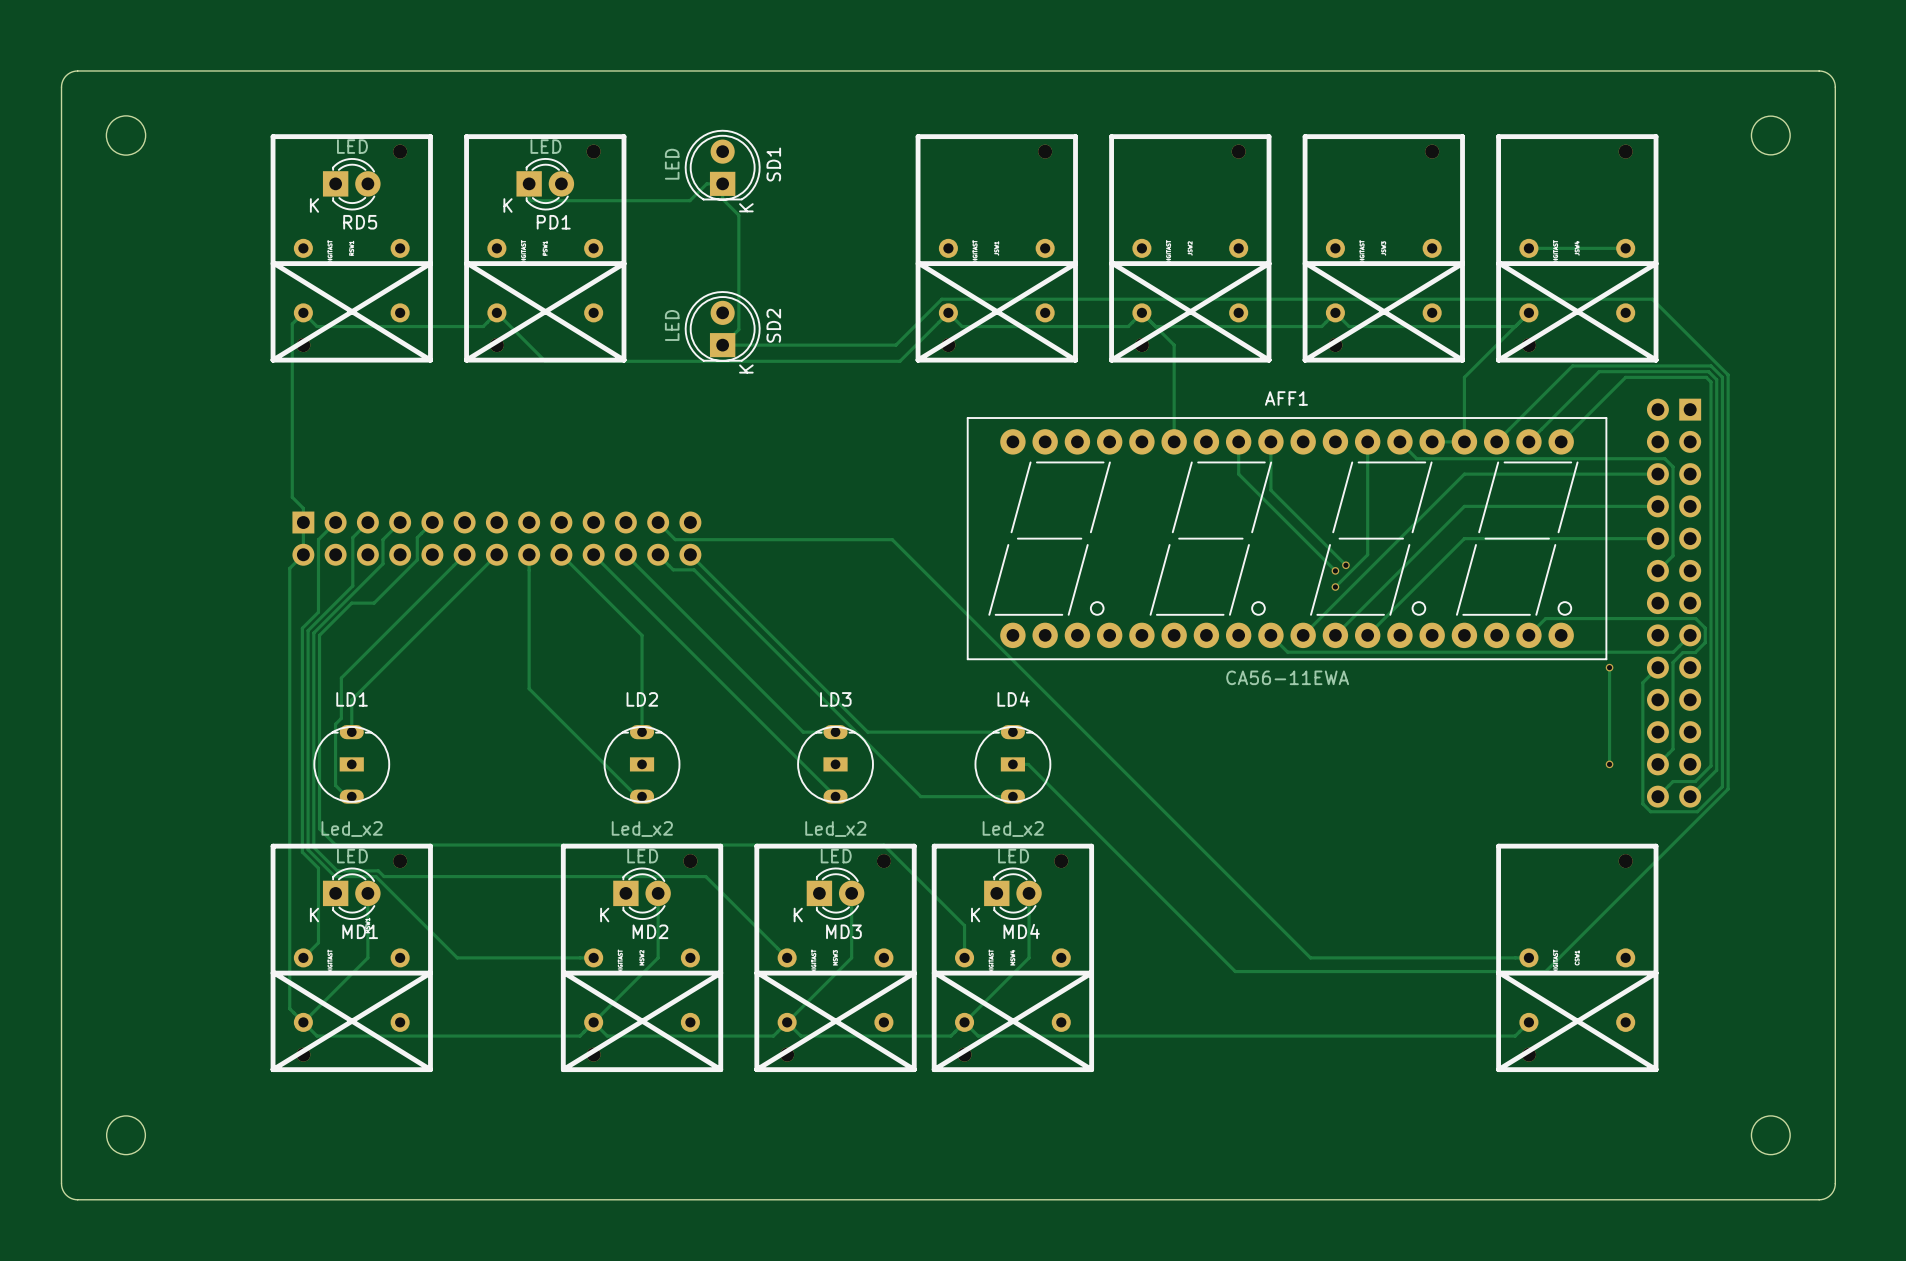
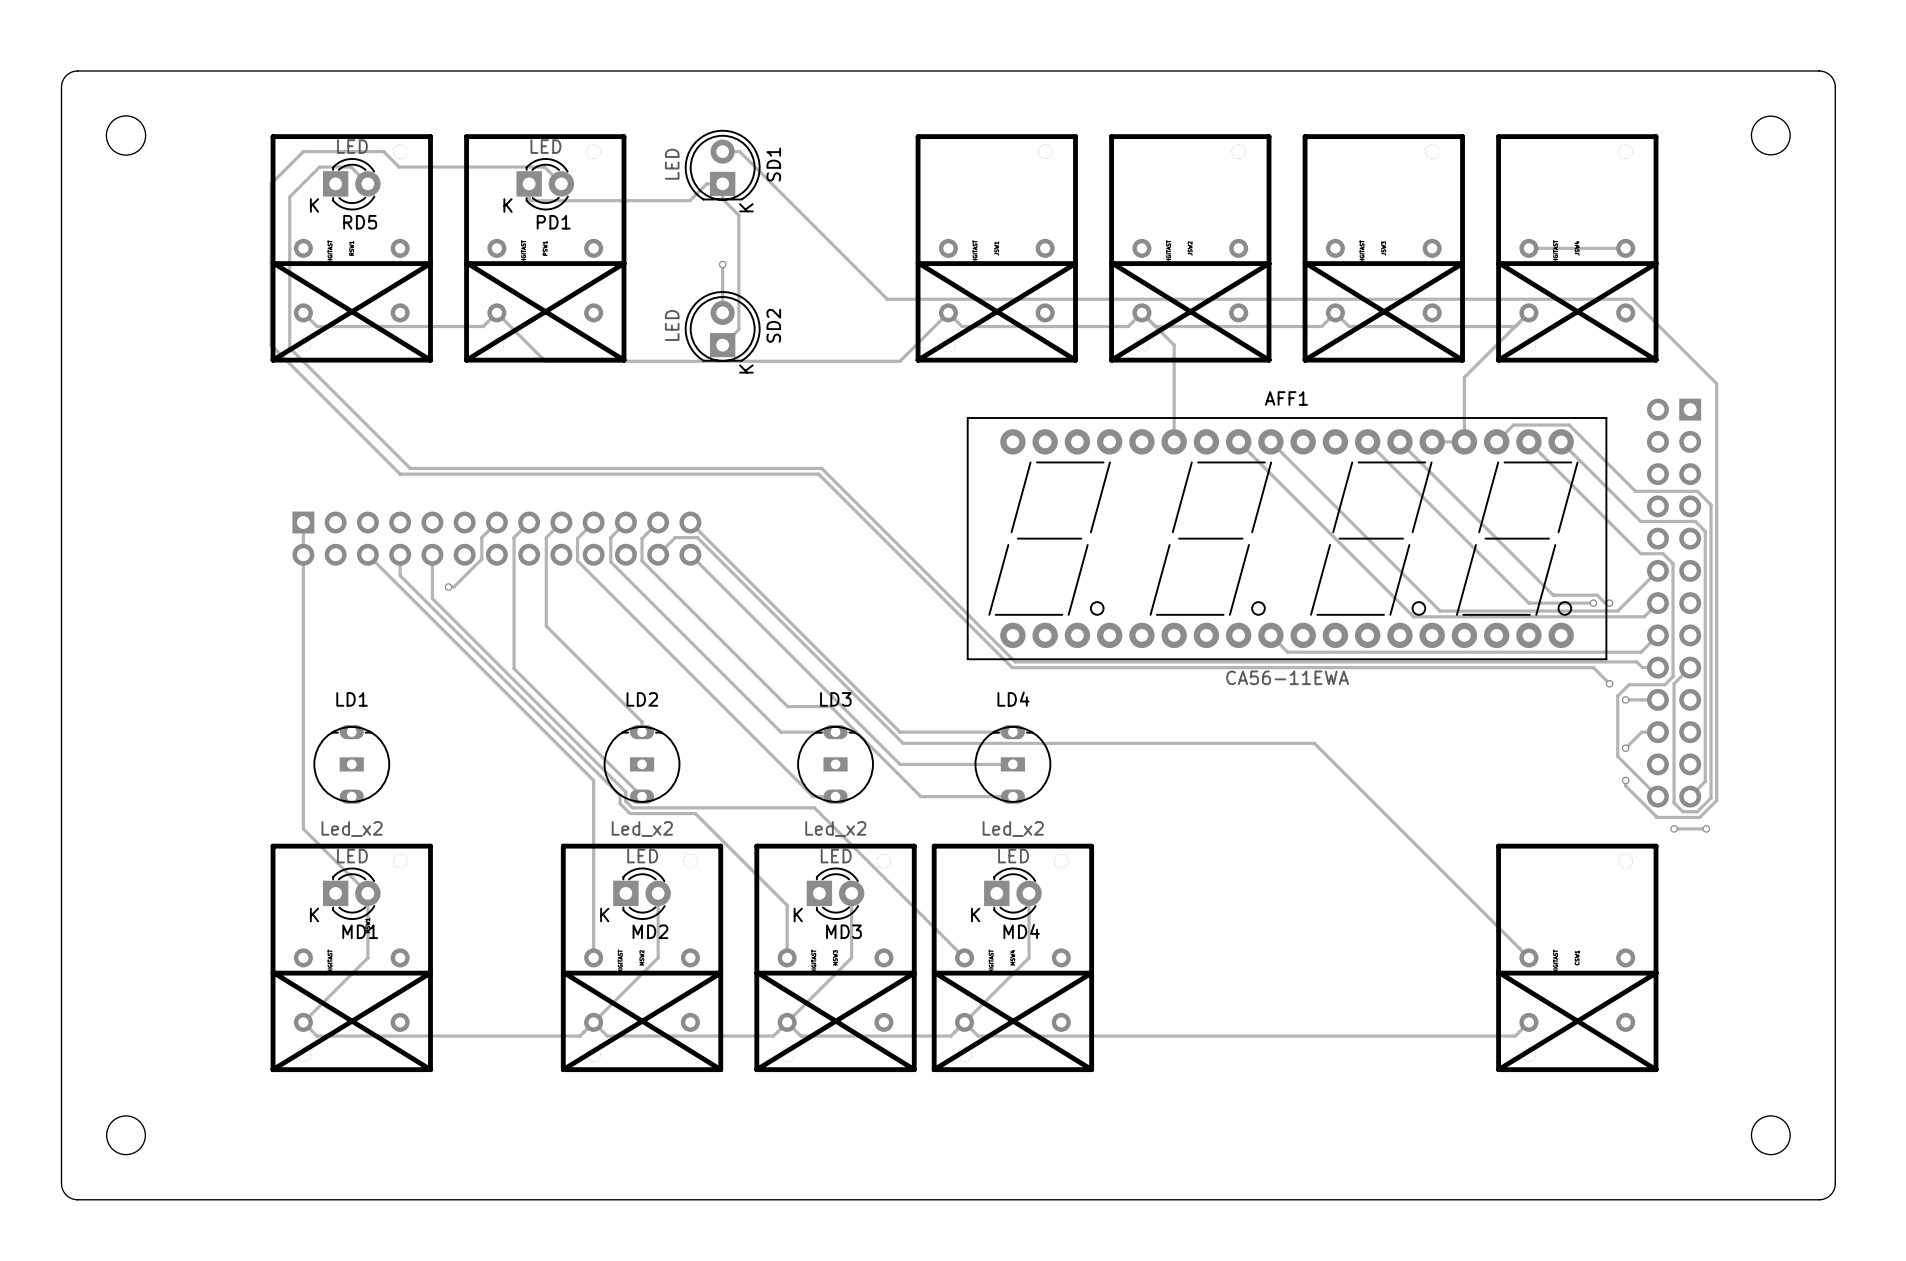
track: none -> (367, 183) (351, 167) (319, 167) (289, 196) (289, 347) (410, 468) (821, 468) (1015, 661) (1636, 661) (1642, 667) (1657, 667)
track: none -> (561, 183) (544, 167) (399, 167) (383, 151) (303, 151) (271, 183) (271, 345) (400, 474) (818, 474) (1012, 667) (1593, 667) (1609, 683)
track: none -> (722, 264) (722, 312)
via: none -> (722, 264)
track: (941, 299) (895, 345) (723, 345) -> (941, 299) (887, 299) (739, 151) (722, 151)
track: (1632, 299) (1652, 299) (1728, 374) (1728, 789) (1716, 800) -> none
track: (303, 312) (292, 323) (292, 497) (303, 508) (303, 522) -> none
track: (1716, 383) (1716, 379) (1708, 371) (1599, 371) (1528, 441) -> (1716, 383) (1632, 299)
track: (1513, 425) (1572, 365) (1711, 365) (1722, 377) (1722, 786) (1710, 798) -> none
track: (1238, 441) (1238, 474) (1335, 570) -> (1238, 441) (1413, 616) (1644, 616) (1657, 603)
track: (1270, 441) (1270, 490) (1347, 566) -> (1270, 441) (1440, 611) (1617, 611) (1657, 570)
track: (1367, 441) (1367, 554) (1335, 587) -> (1367, 441) (1528, 603) (1593, 603)
track: none -> (1528, 441) (1640, 553) (1663, 553) (1673, 563) (1673, 662)
track: (1561, 441) (1625, 377) (1706, 377) (1710, 382) (1710, 504) -> (1513, 425) (1569, 425) (1635, 491) (1697, 491) (1710, 504)
track: (1416, 458) (1664, 458) (1673, 466) (1673, 555) (1657, 570) -> (1416, 458) (1553, 595) (1597, 595) (1605, 603) (1609, 603)
track: (1657, 474) (1464, 474) (1303, 635) -> none
track: (1657, 506) (1464, 506) (1335, 635) -> none
track: (335, 522) (318, 539) (318, 612) (302, 628) (302, 852) (318, 868) (318, 942) (303, 957) -> none
track: (367, 522) (352, 537) (352, 585) (308, 630) (308, 849) (334, 876) (375, 876) (457, 957) (593, 957) -> (367, 554) (593, 780) (593, 957)
track: (400, 522) (382, 539) (382, 563) (313, 633) (313, 847) (337, 870) (378, 870) (384, 876) (705, 876) (787, 957) -> (400, 554) (400, 575) (620, 795) (620, 803) (630, 813) (695, 813) (787, 905) (787, 957)
track: (432, 522) (417, 537) (417, 559) (374, 603) (351, 603) (319, 635) (319, 828) (335, 845) (883, 845) (964, 925) (964, 957) -> (432, 554) (432, 598) (625, 791) (625, 801) (632, 807) (814, 807) (964, 957)
track: none -> (496, 522) (481, 537) (481, 559) (453, 587) (448, 587)
track: none -> (529, 522) (514, 537) (514, 668) (642, 796)
track: (658, 522) (675, 539) (892, 539) (1310, 957) (1528, 957) -> (658, 554) (675, 537) (697, 537) (903, 743) (1314, 743) (1528, 957)
track: none -> (690, 522) (900, 732)
track: (1657, 538) (1464, 538) (1367, 635) -> none
track: (303, 554) (289, 568) (289, 1008) (303, 1022) -> (303, 554) (303, 828) (367, 893)
track: (464, 554) (341, 678) (341, 718) (335, 724) (335, 785) (346, 796) -> none
track: (496, 554) (351, 699) (351, 732) -> none
track: (529, 554) (529, 688) (637, 796) -> none
track: (561, 554) (642, 635) (642, 721) -> (561, 522) (546, 537) (546, 626) (642, 721)
track: (593, 554) (835, 796) -> (593, 522) (577, 538) (577, 560) (813, 796) (835, 796)
track: (625, 554) (803, 732) -> (625, 522) (610, 537) (610, 562) (780, 732) (803, 732)
track: (658, 554) (673, 569) (694, 569) (830, 706) -> (658, 522) (642, 538) (642, 560) (787, 706) (830, 706)
via: (1345, 565) -> none
via: (1335, 570) -> none
via: none -> (448, 587)
via: (1335, 587) -> none
via: none -> (1593, 603)
via: none -> (1609, 603)
track: (1705, 628) (1695, 618) (1545, 618) (1528, 635) -> (1705, 628) (1705, 531) (1695, 521) (1640, 521) (1561, 441)
track: (1690, 635) (1673, 652) (1641, 652) -> (1657, 635) (1641, 652)
track: (1705, 642) (1695, 652) (1682, 652) (1673, 662) -> (1705, 642) (1705, 781)
track: (1609, 667) (1609, 764) -> none
via position: (1609, 667) -> (1609, 683)
track: (1657, 667) (1642, 682) (1642, 803) (1650, 811) (1682, 811) -> (1690, 667) (1674, 683) (1674, 802) (1682, 811)
track: (1673, 676) (1673, 749) (1657, 764) -> (1673, 676) (1664, 684) (1629, 684) (1617, 696) (1617, 756) (1657, 796)
track: none -> (1625, 699) (1657, 699)
via: none -> (1625, 699)
track: (867, 732) (900, 732) -> (867, 732) (900, 764) (1012, 764)
track: none -> (1657, 732) (1641, 732) (1625, 748)
via: none -> (1625, 748)
track: (1012, 764) (1028, 764) (1235, 971) (1545, 971) (1699, 817) -> (1625, 780) (1625, 785) (1656, 817) (1699, 817)
via: (1609, 764) -> none
track: (1710, 765) (1695, 781) (1673, 781) (1657, 796) -> (1710, 765) (1710, 798)
track: (1716, 770) (1705, 781) -> (1716, 770) (1716, 800)
via: none -> (1625, 780)
track: none -> (1674, 828) (1706, 828)
via: none -> (1674, 828)
via: none -> (1706, 828)

